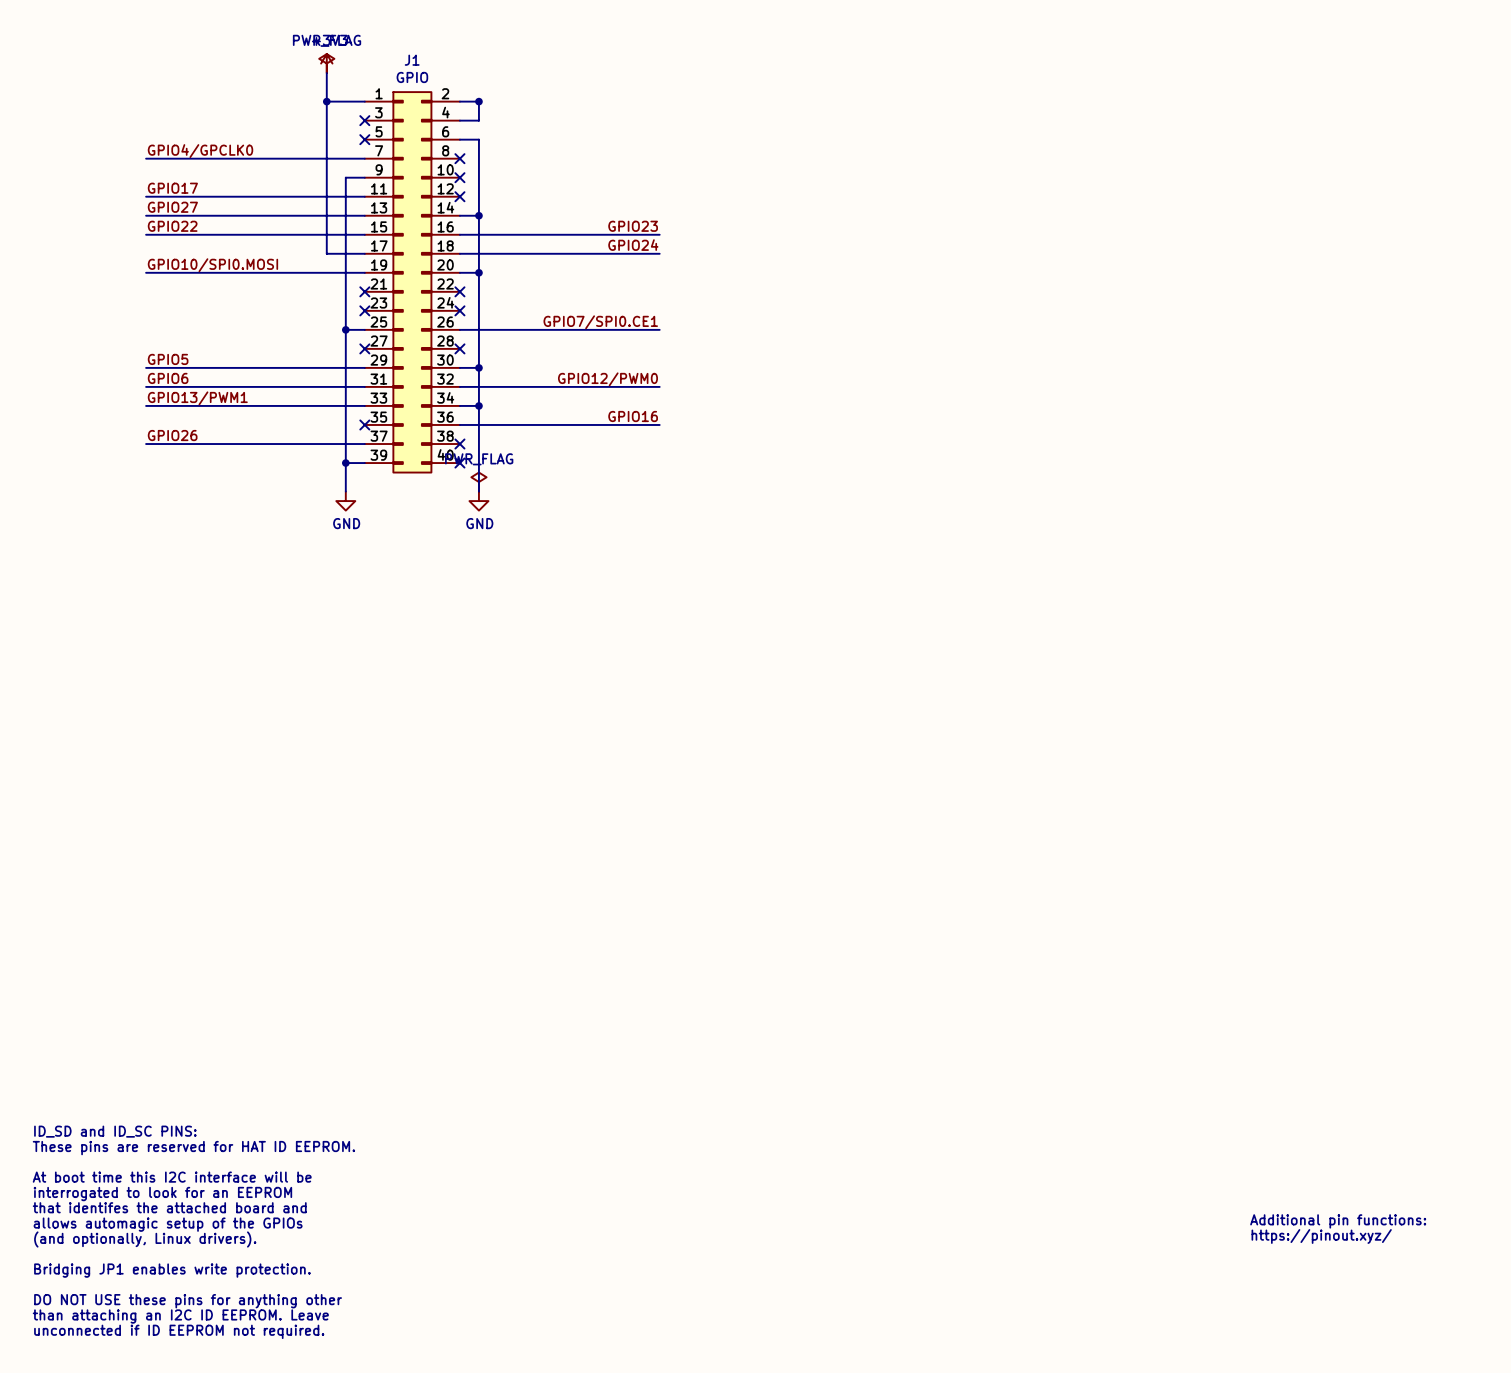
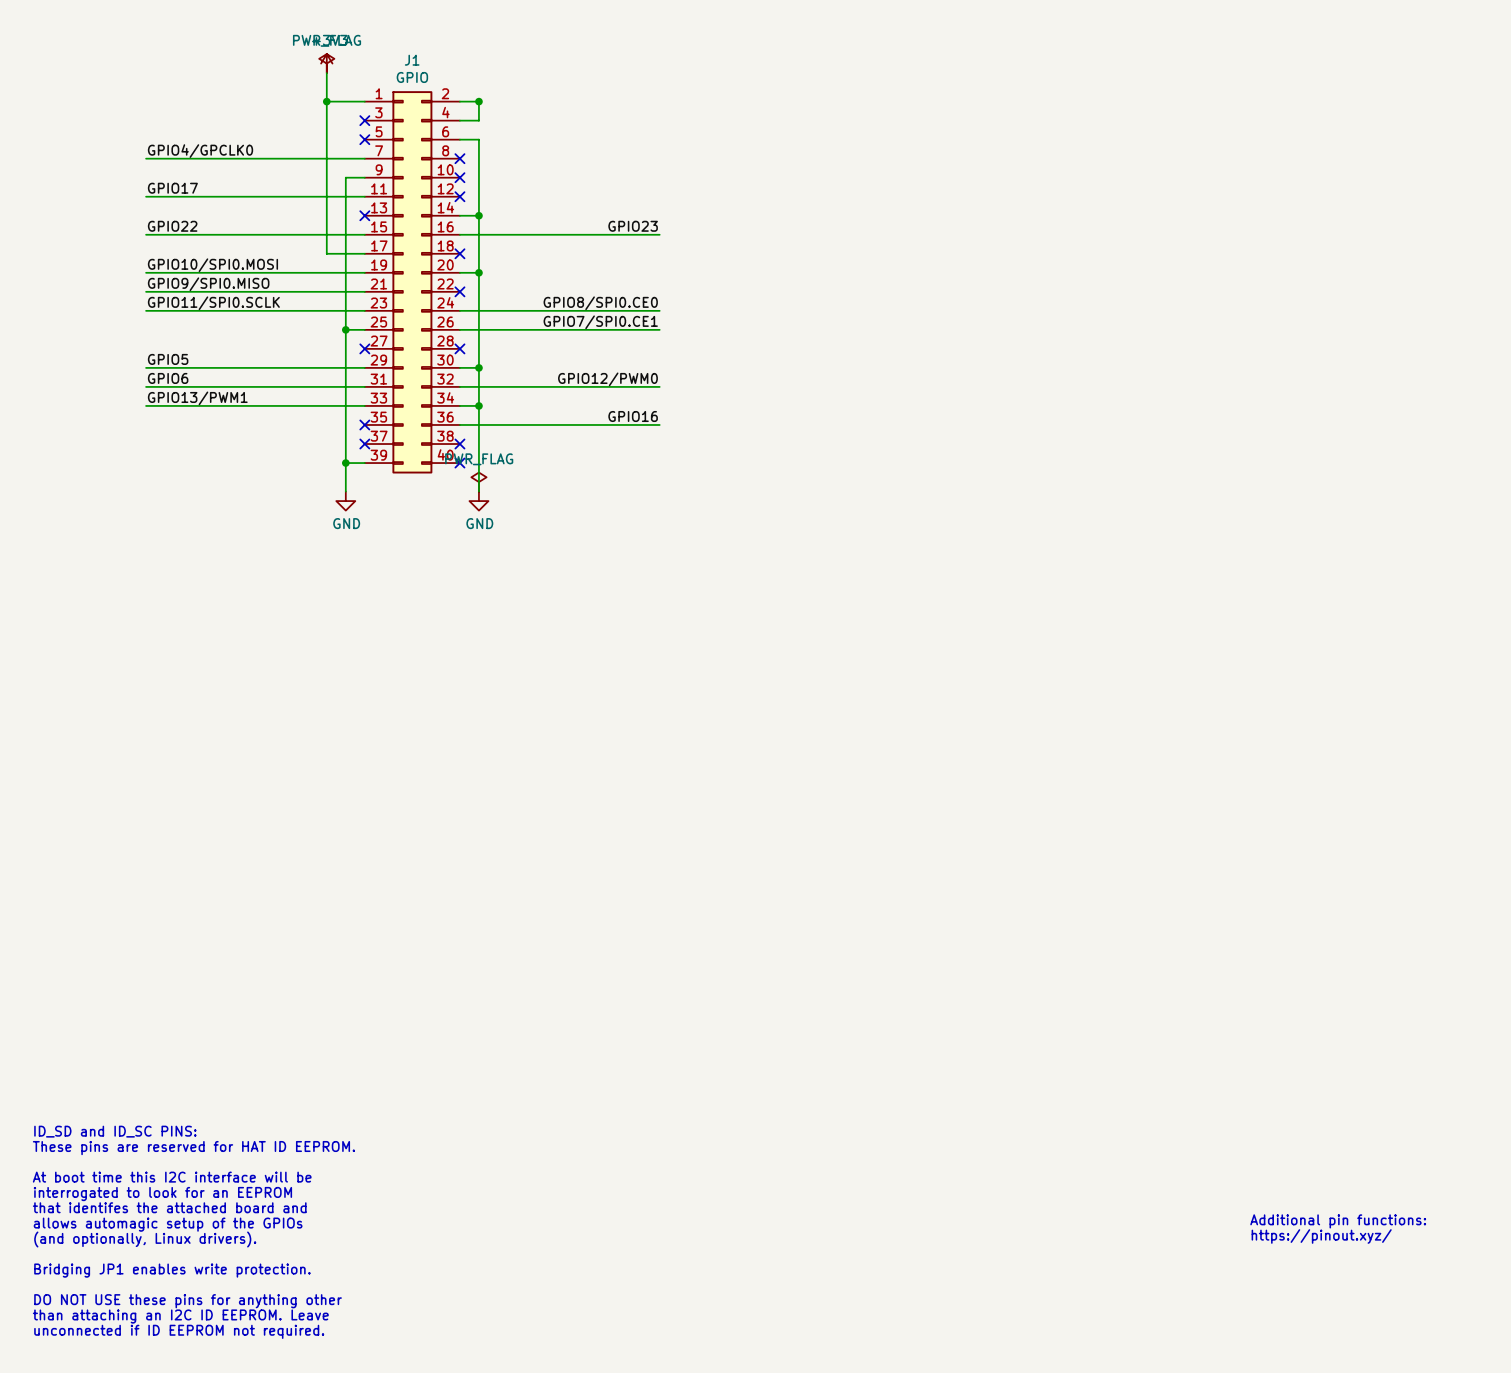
label: GPIO27 (172, 207) -> none
wire: (146, 215) (364, 215) -> (146, 291) (364, 291)
no-connect mark: none -> (364, 215)
label: GPIO24 (633, 245) -> none
wire: (459, 253) (659, 253) -> (459, 310) (659, 310)
no-connect mark: none -> (459, 253)
label: none -> GPIO9/SPI0.MISO (208, 284)
no-connect mark: (364, 291) -> none
label: none -> GPIO11/SPI0.SCLK (213, 303)
label: none -> GPIO8/SPI0.CE0 (600, 303)
no-connect mark: (364, 310) -> none
no-connect mark: (459, 310) -> none
label: GPIO26 (172, 435) -> none
wire: (146, 444) (364, 444) -> (146, 310) (364, 310)
no-connect mark: none -> (364, 444)

